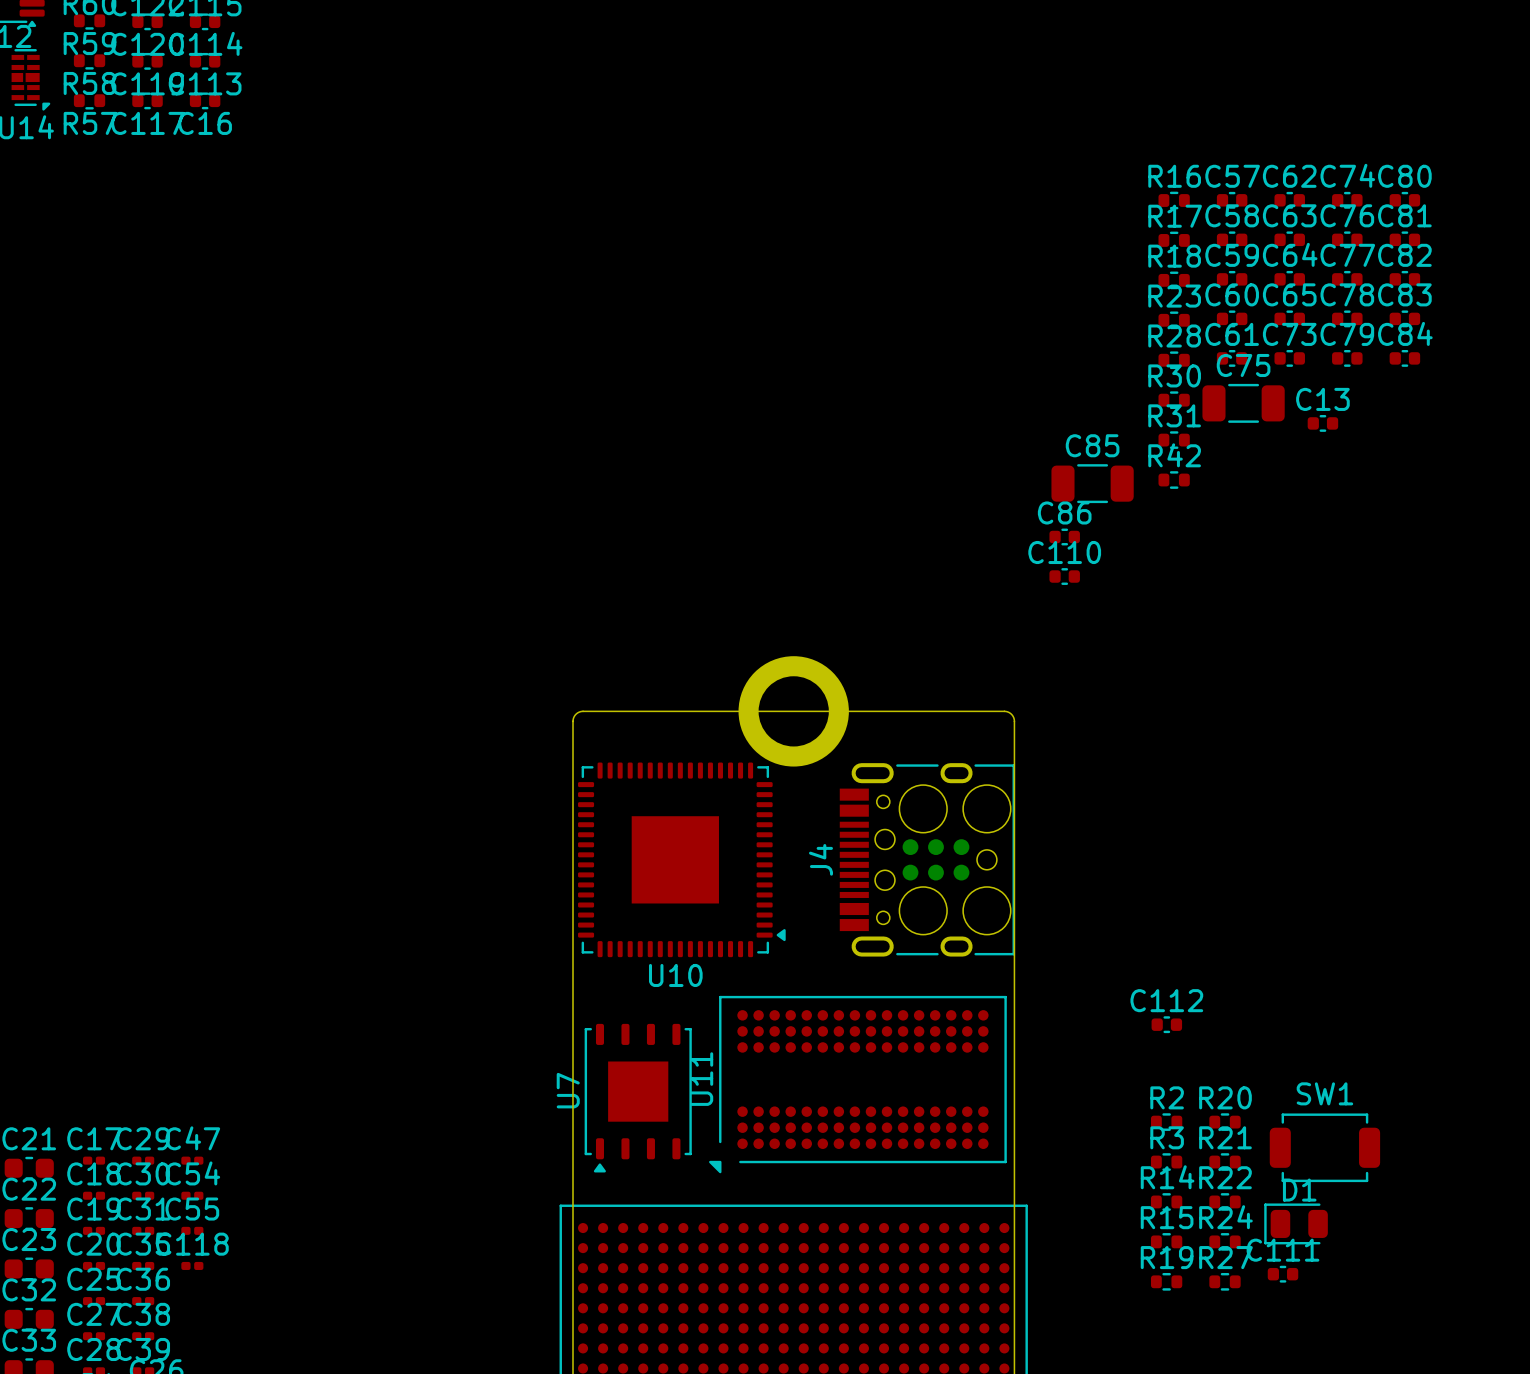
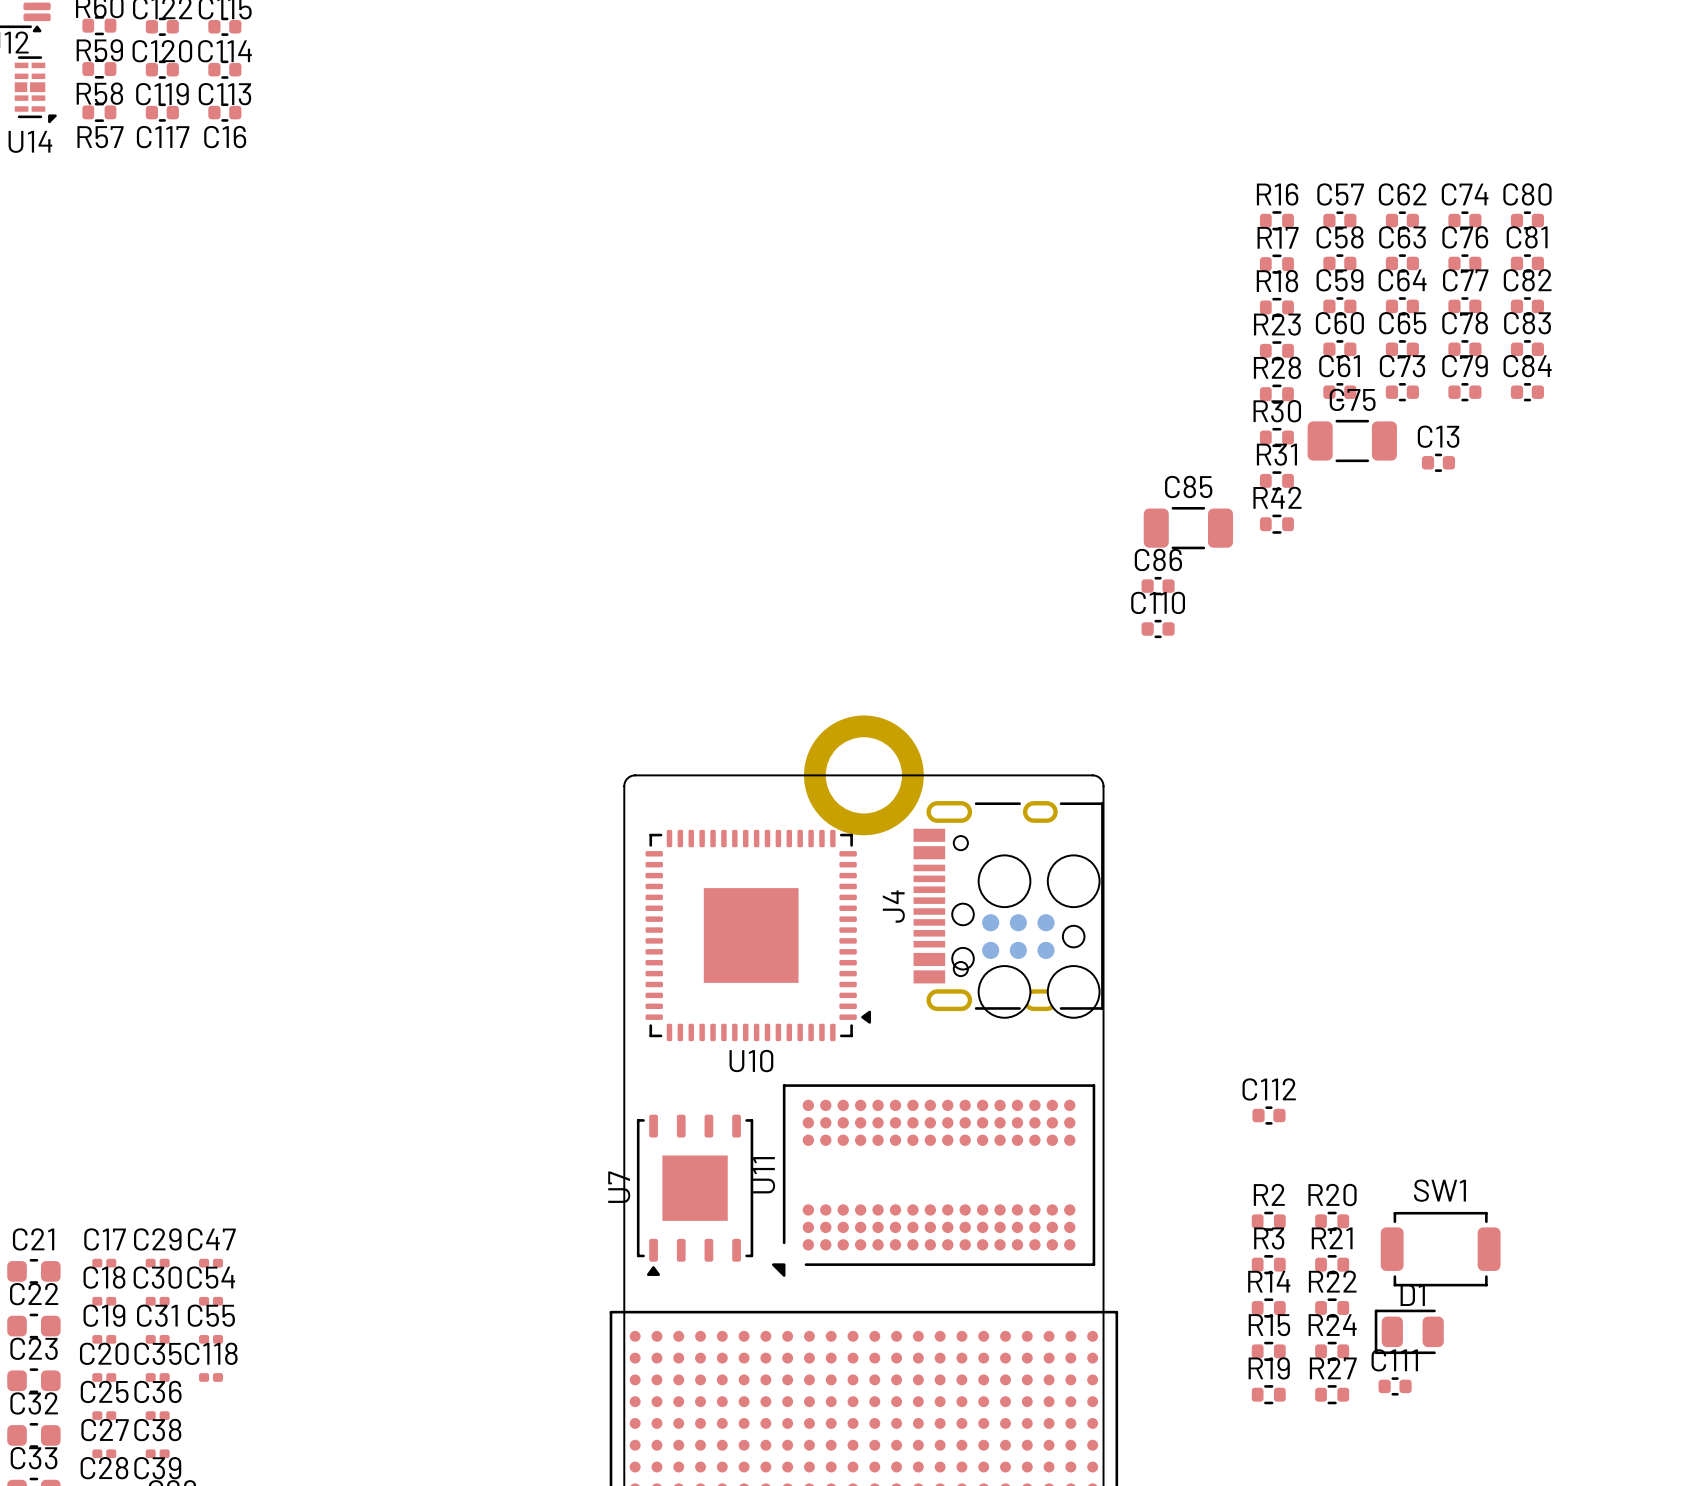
U10 position: (681, 859) -> (758, 935)
J4 position: (927, 859) -> (1008, 906)

